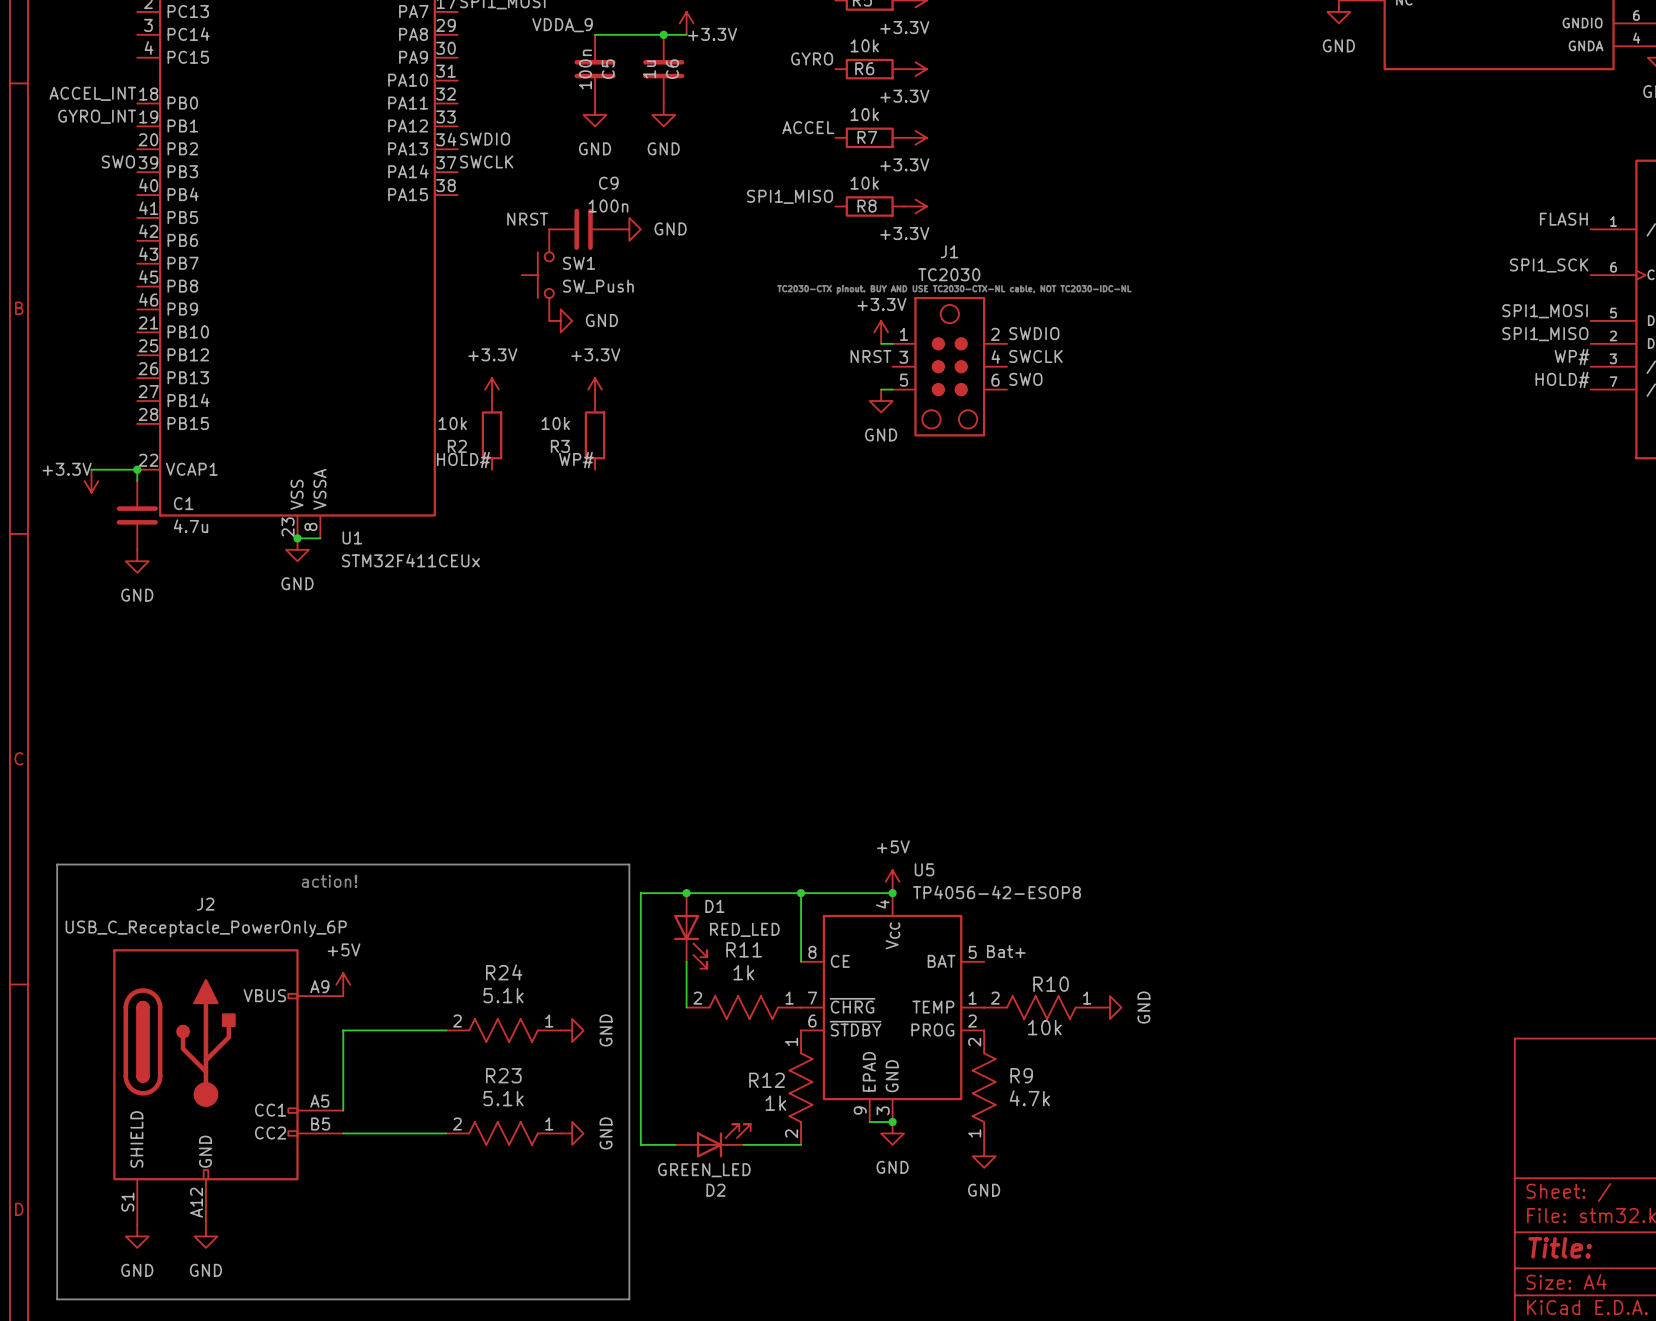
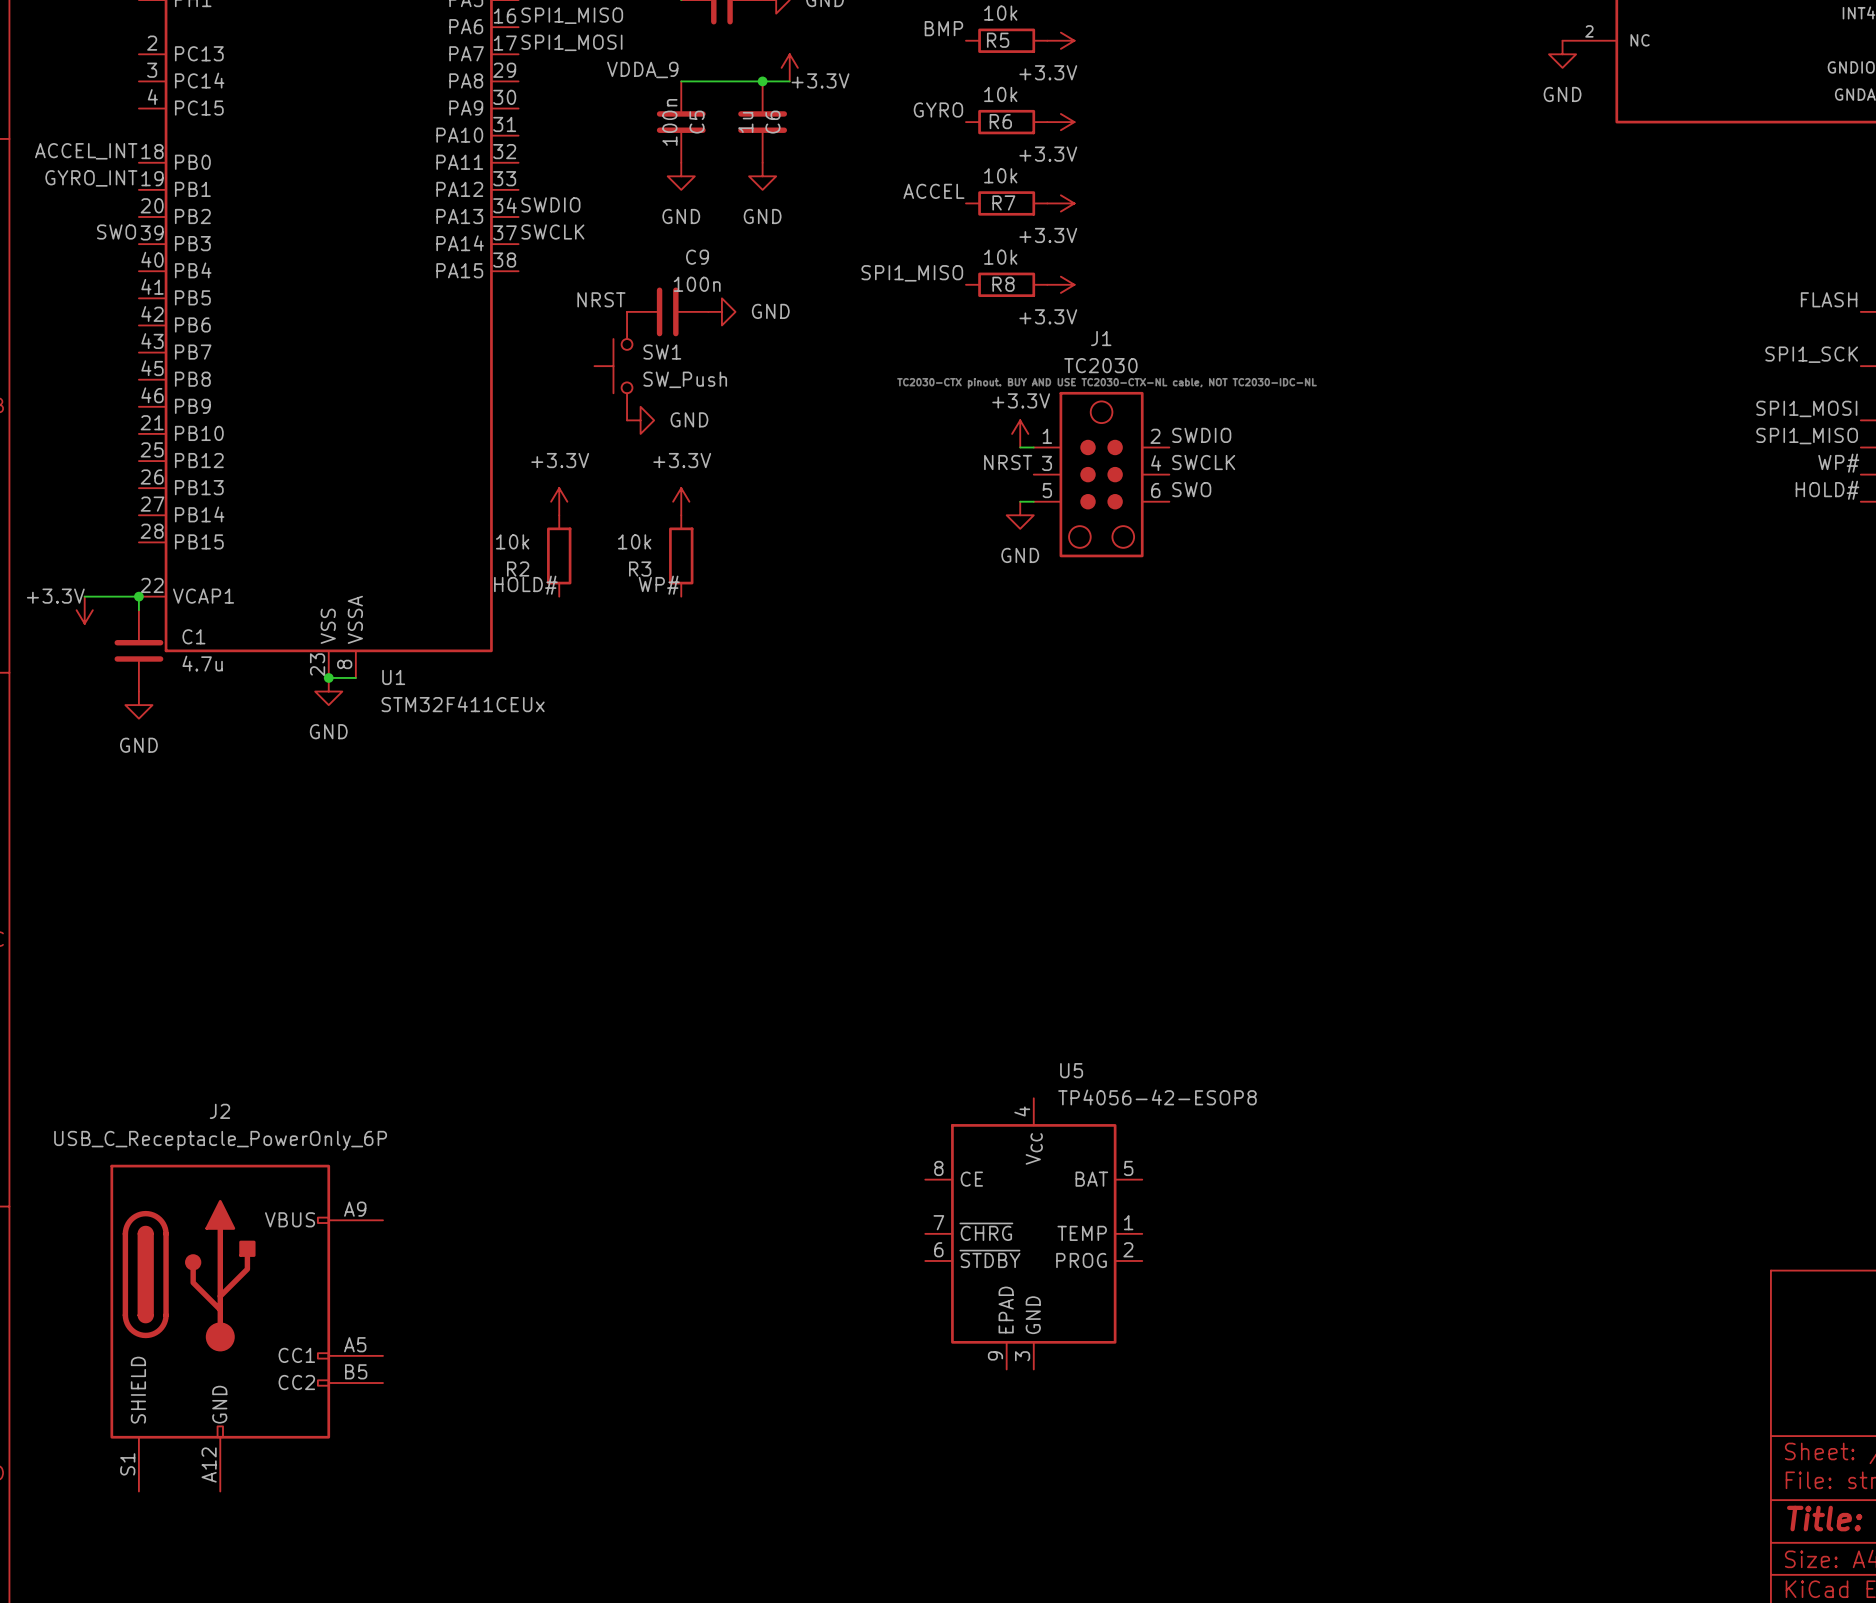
line: (57, 864) (629, 864) (629, 1299) (57, 1299) (57, 864) -> none
text: action! (329, 881) -> none
power symbol: +5V (892, 881) -> none
junction: (686, 893) -> none
wire: (801, 893) (801, 961) -> none
junction: (801, 893) -> none
wire: (892, 893) (640, 893) (640, 1144) (675, 1144) -> none
junction: (892, 893) -> none
D1: RED_LED (690, 930) -> none
label: Bat+ (1006, 951) -> none
wire: (686, 961) (686, 1007) -> none
power symbol: +5V (343, 984) -> none
R11: 1k (743, 1007) -> none
R10: 10k (1041, 1007) -> none
power symbol: GND (1110, 1007) -> none
wire: (446, 1030) (343, 1030) (343, 1110) -> none
R24: 5.1k (503, 1030) -> none
power symbol: GND (572, 1030) -> none
R12: 1k (801, 1087) -> none
R9: 4.7k (984, 1087) -> none
wire: (869, 1122) (892, 1122) -> none
junction: (892, 1122) -> none
wire: (343, 1133) (446, 1133) -> none
R23: 5.1k (503, 1133) -> none
power symbol: GND (572, 1133) -> none
power symbol: GND (892, 1133) -> none
D2: GREEN_LED (712, 1140) -> none
wire: (743, 1144) (801, 1144) -> none
power symbol: GND (984, 1156) -> none
power symbol: GND (137, 1236) -> none
power symbol: GND (205, 1236) -> none

